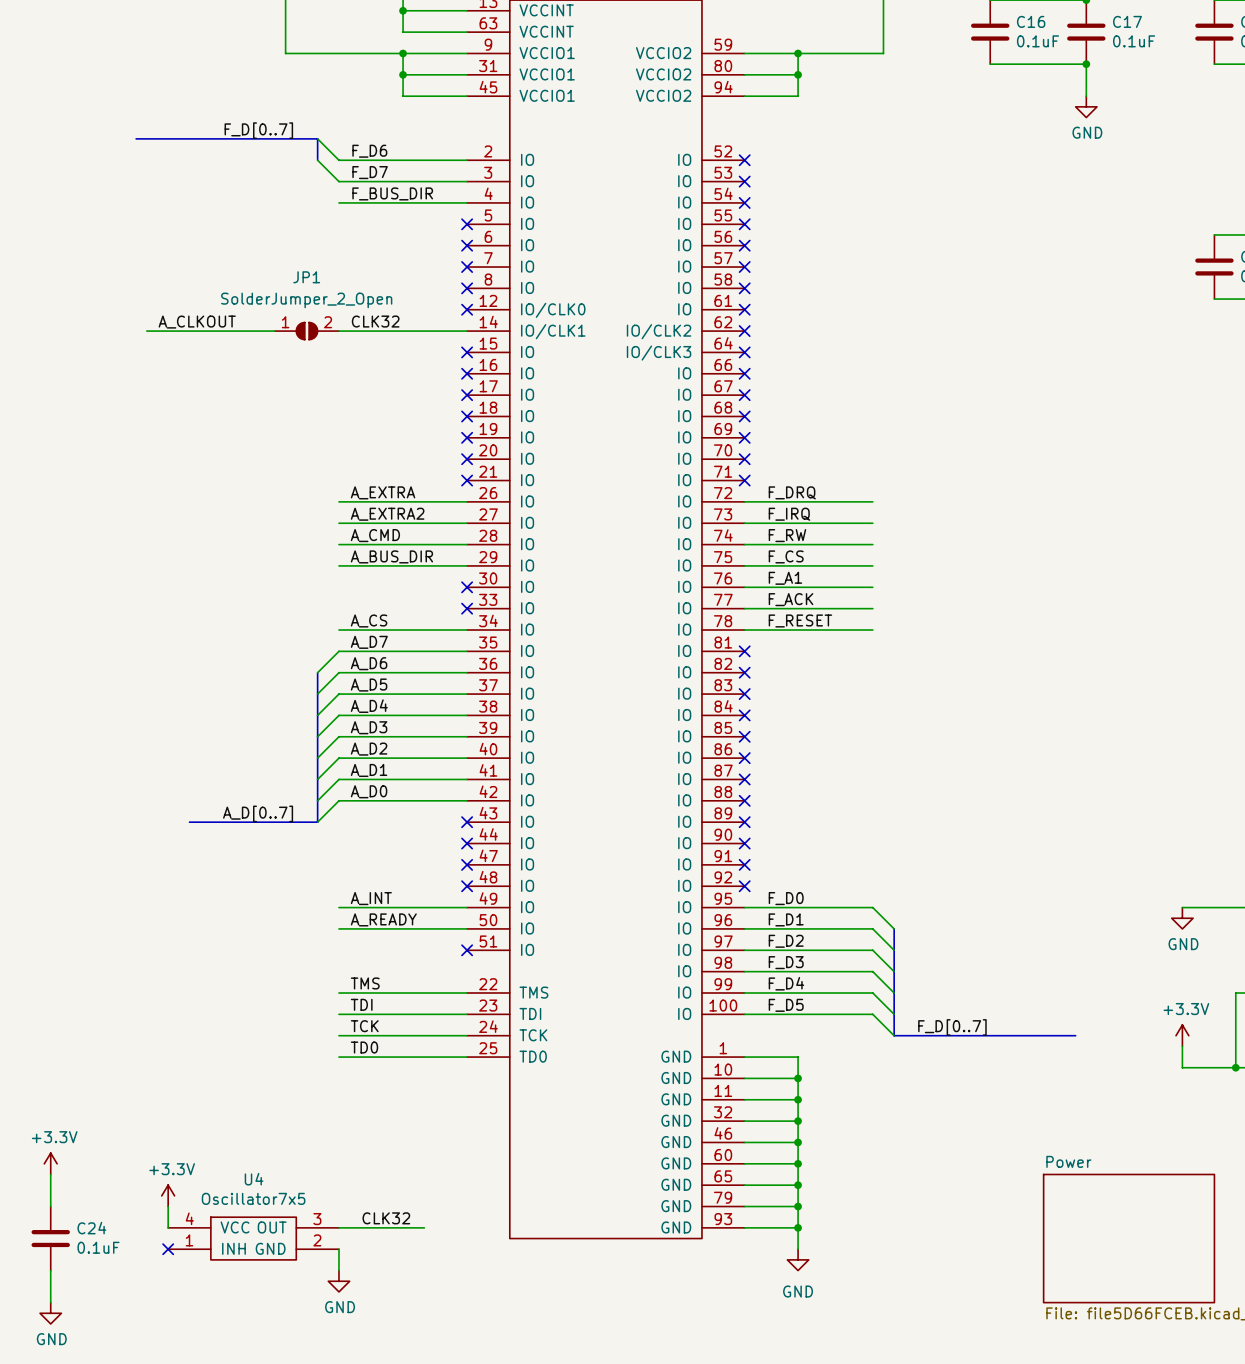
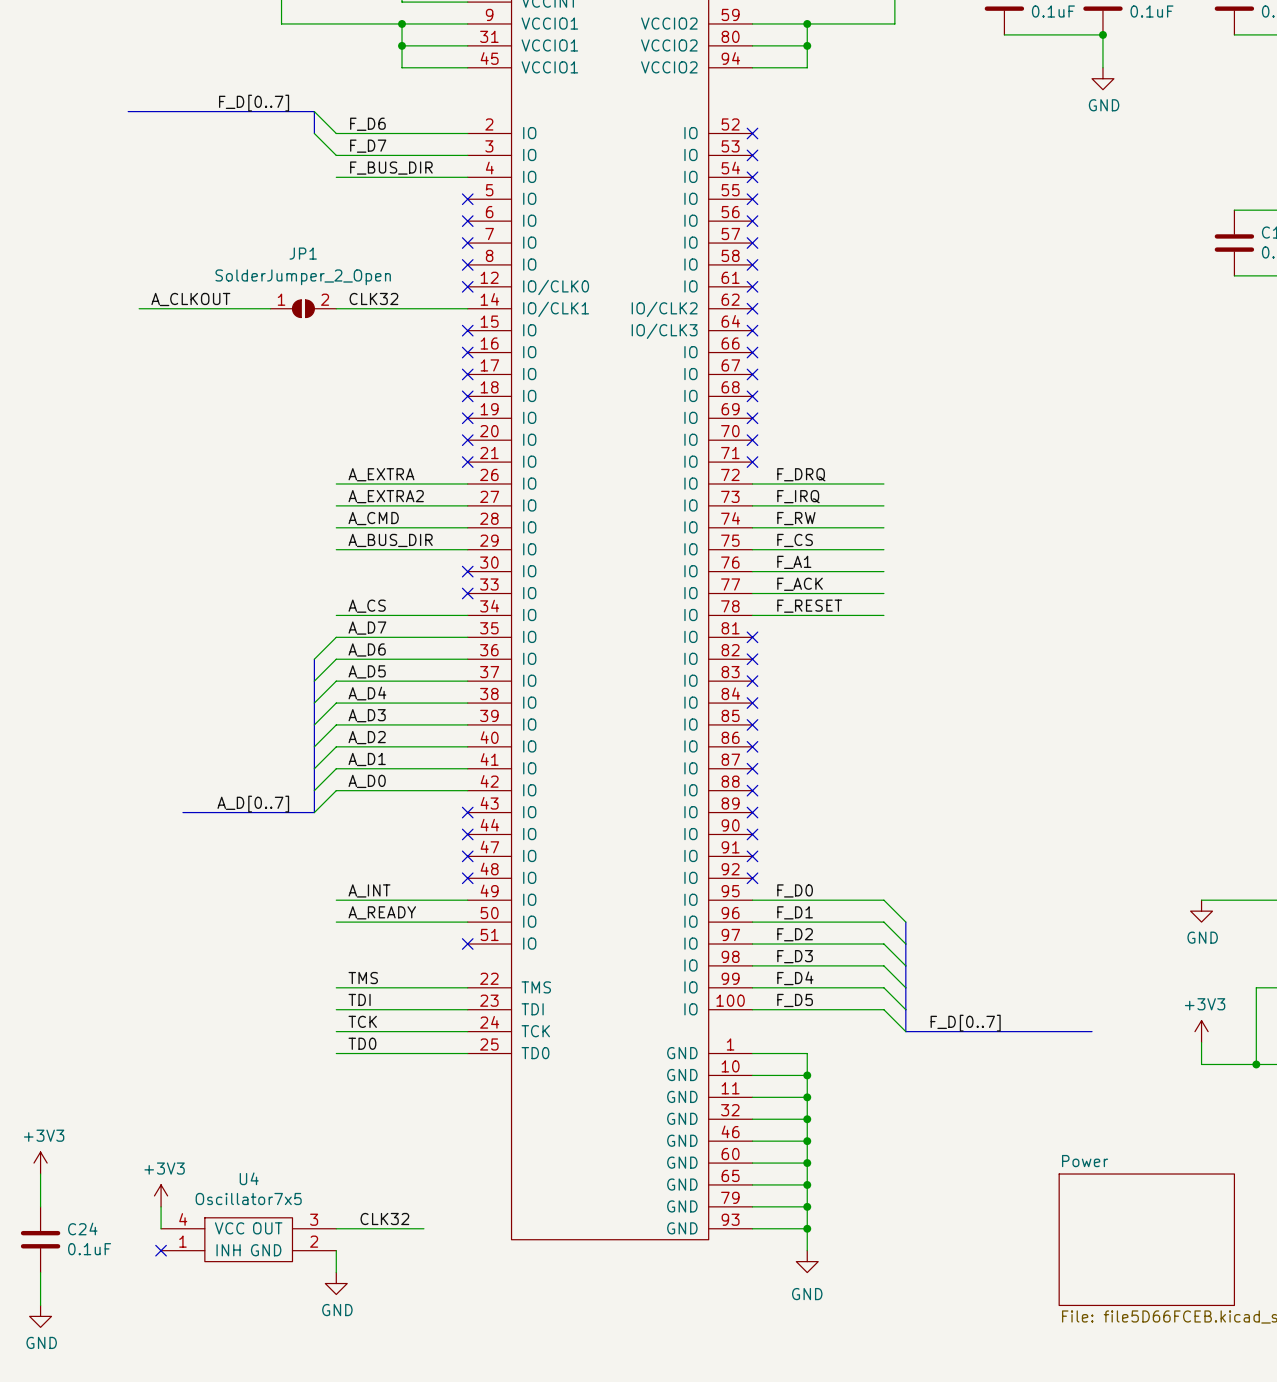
power symbol: +3.3V (1182, 1035) -> +3V3 (1201, 1031)
power symbol: +3.3V (50, 1163) -> +3V3 (40, 1163)
power symbol: +3.3V (168, 1195) -> +3V3 (161, 1195)

